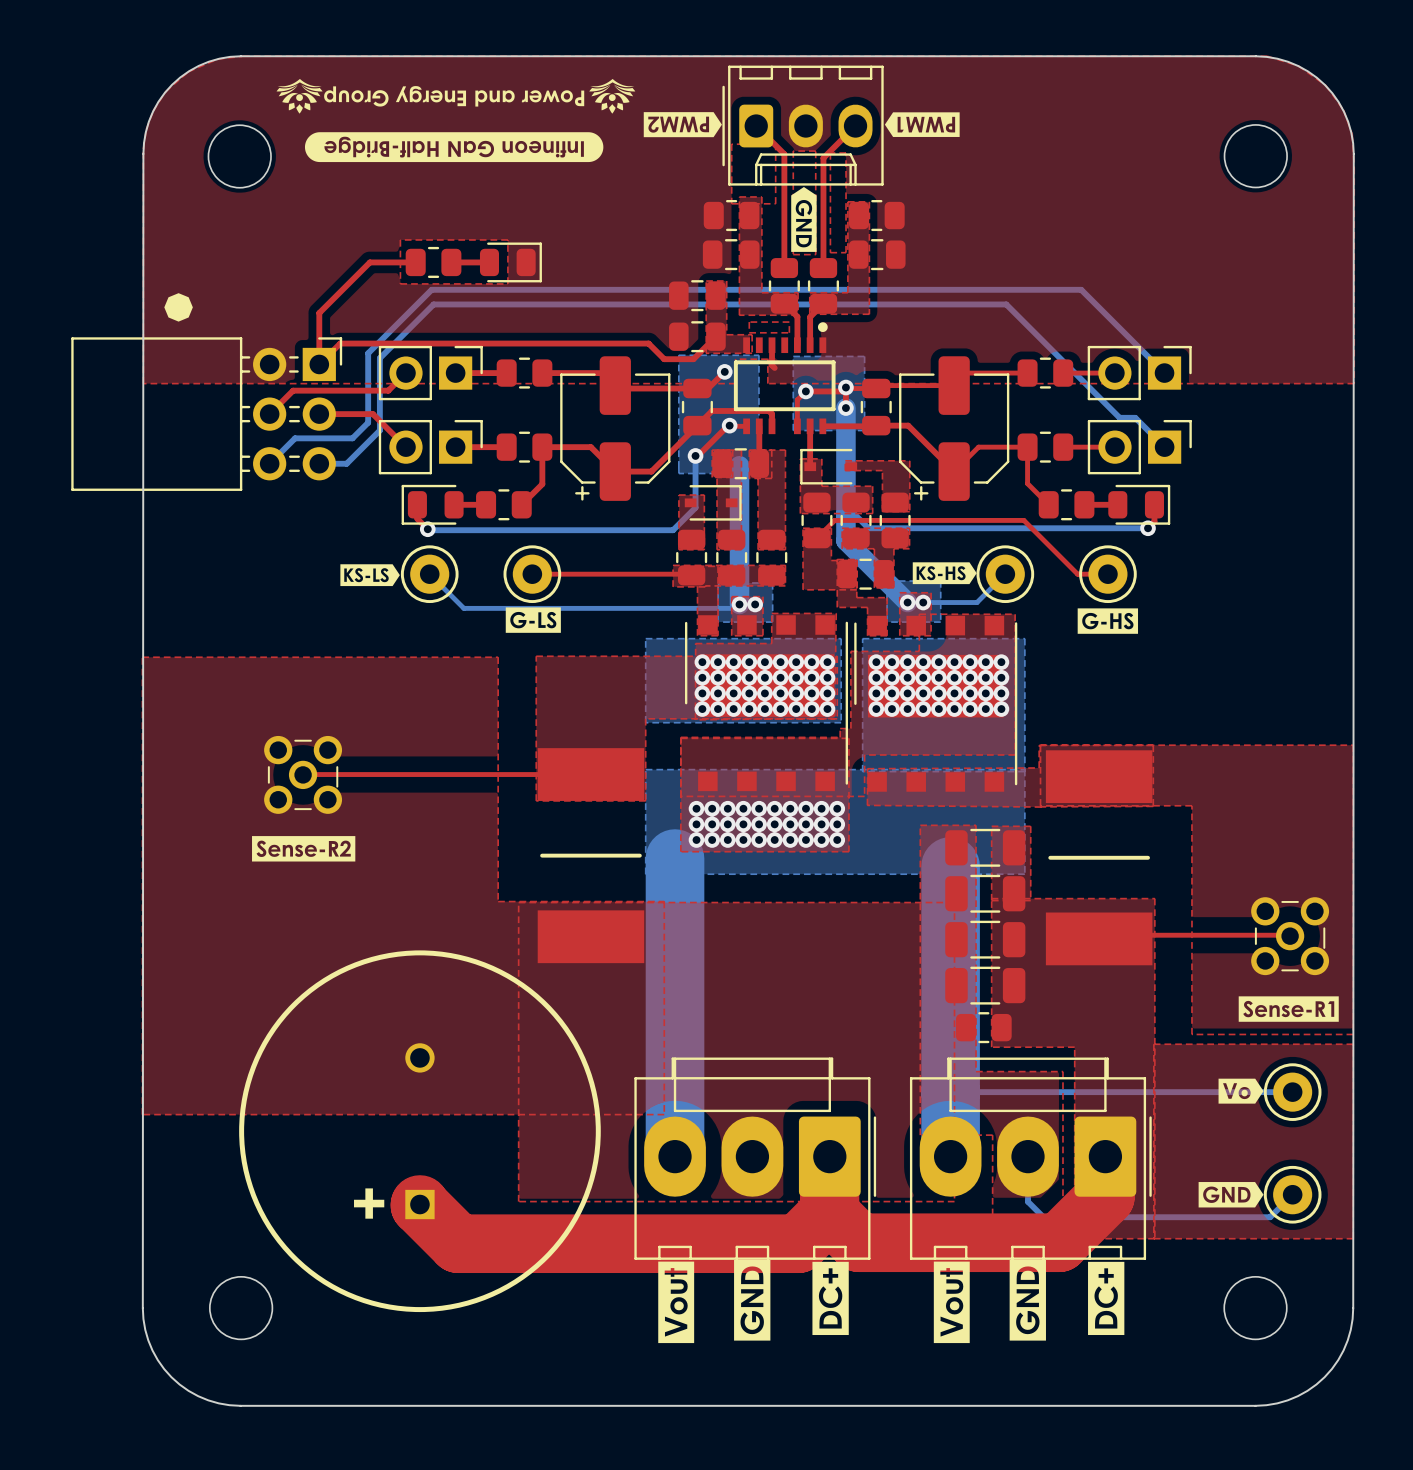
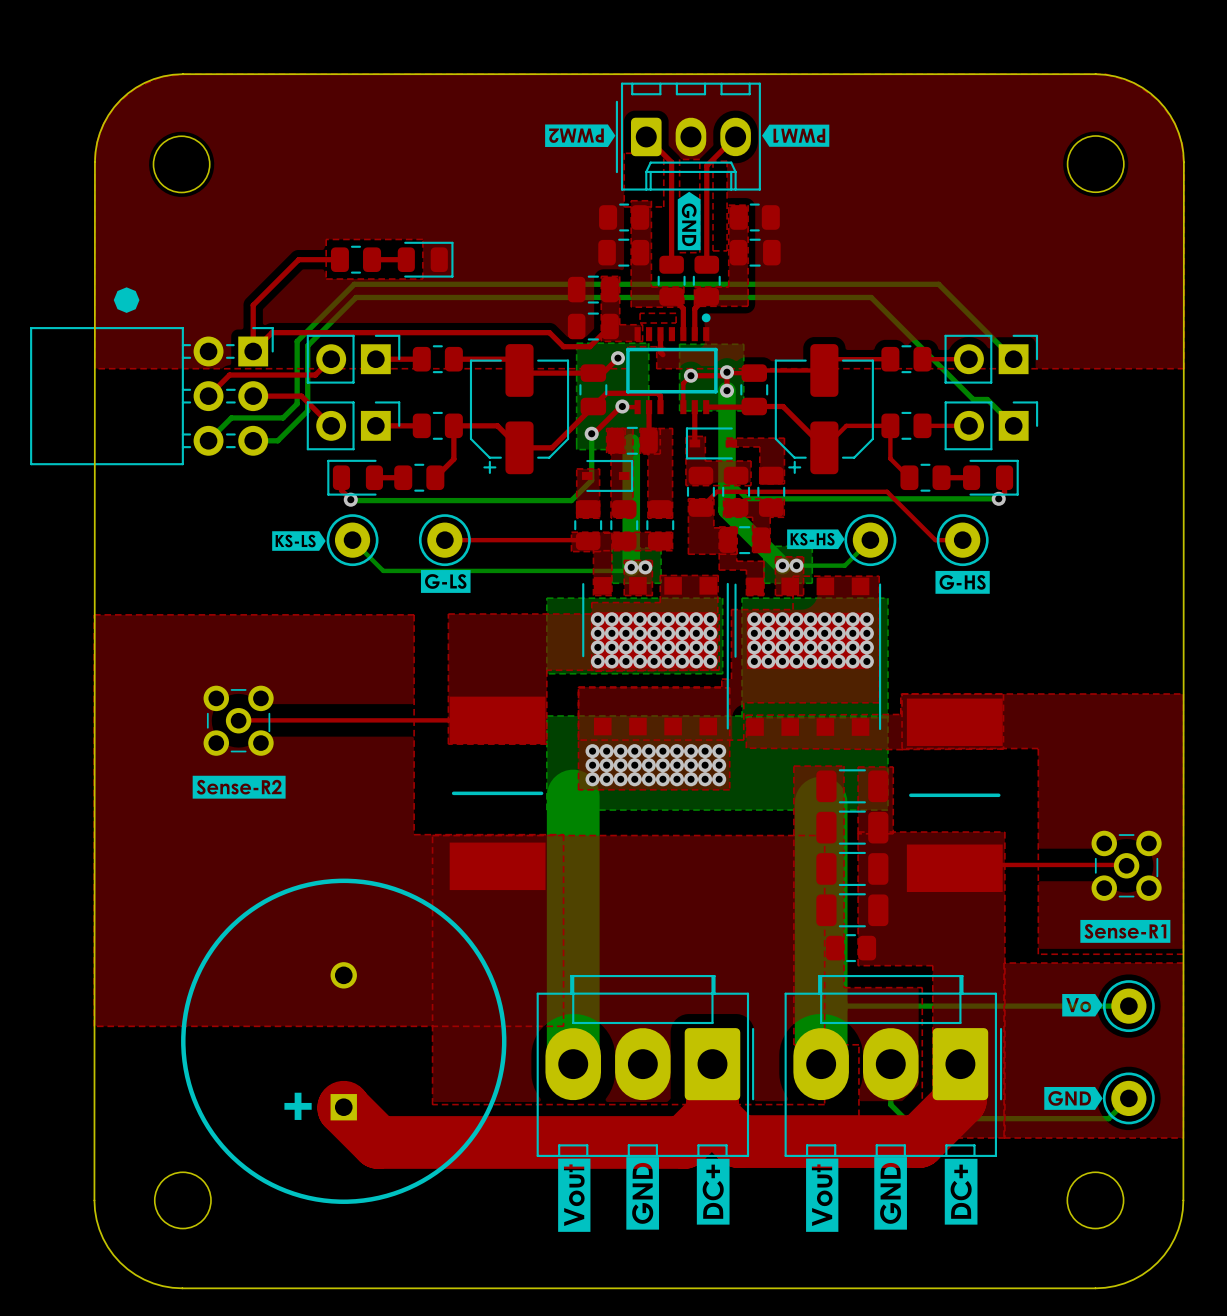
drawing: [276, 78, 636, 163] -> none

